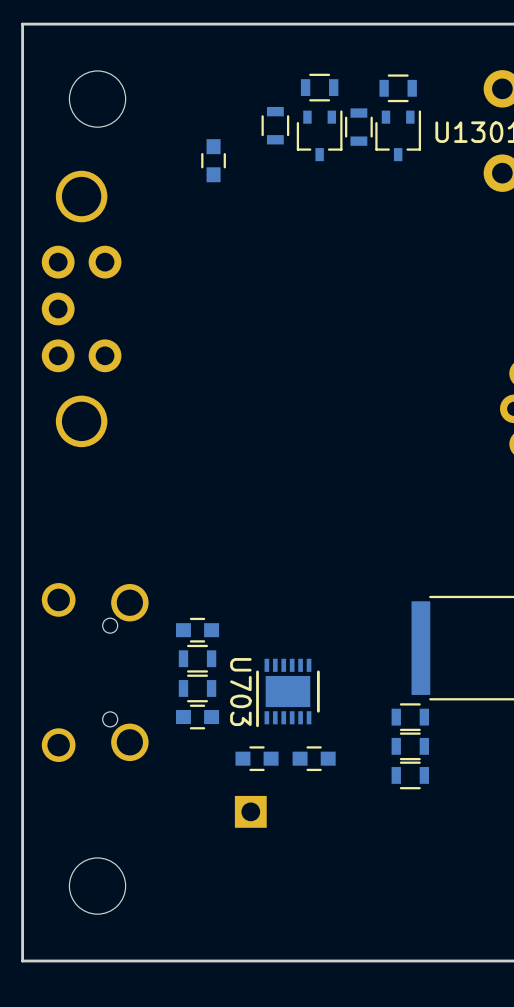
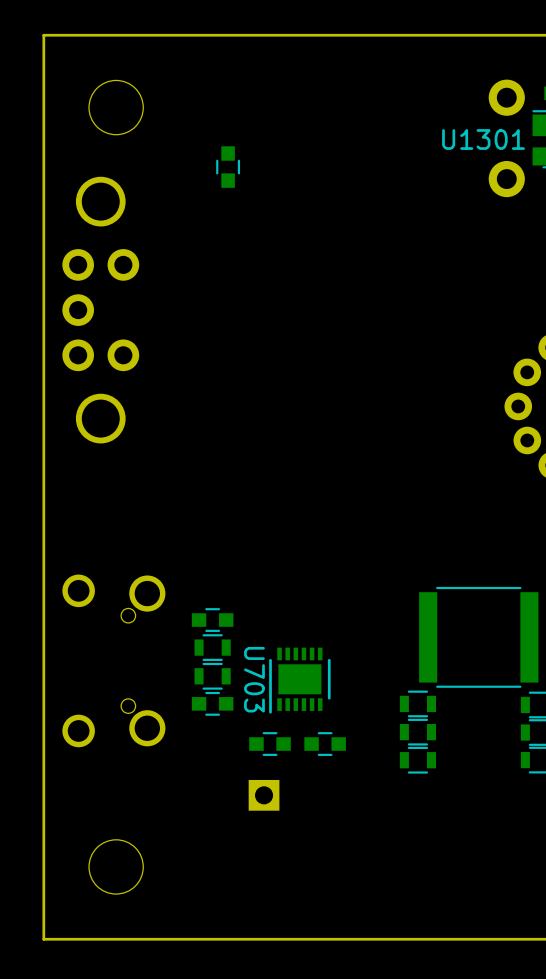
part: (319, 87) -> none
part: (398, 88) -> none
part: (275, 125) -> none
part: (358, 127) -> none
part: (319, 135) -> none
part: (398, 135) -> none

